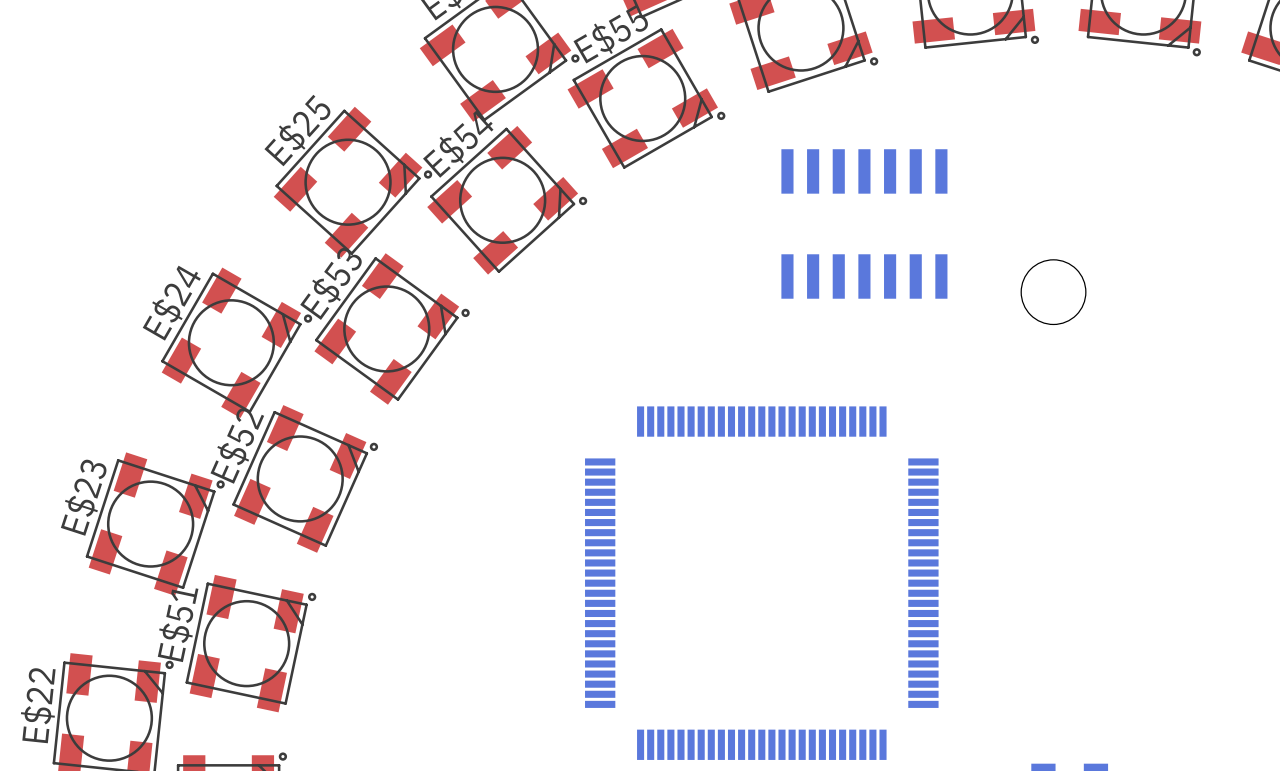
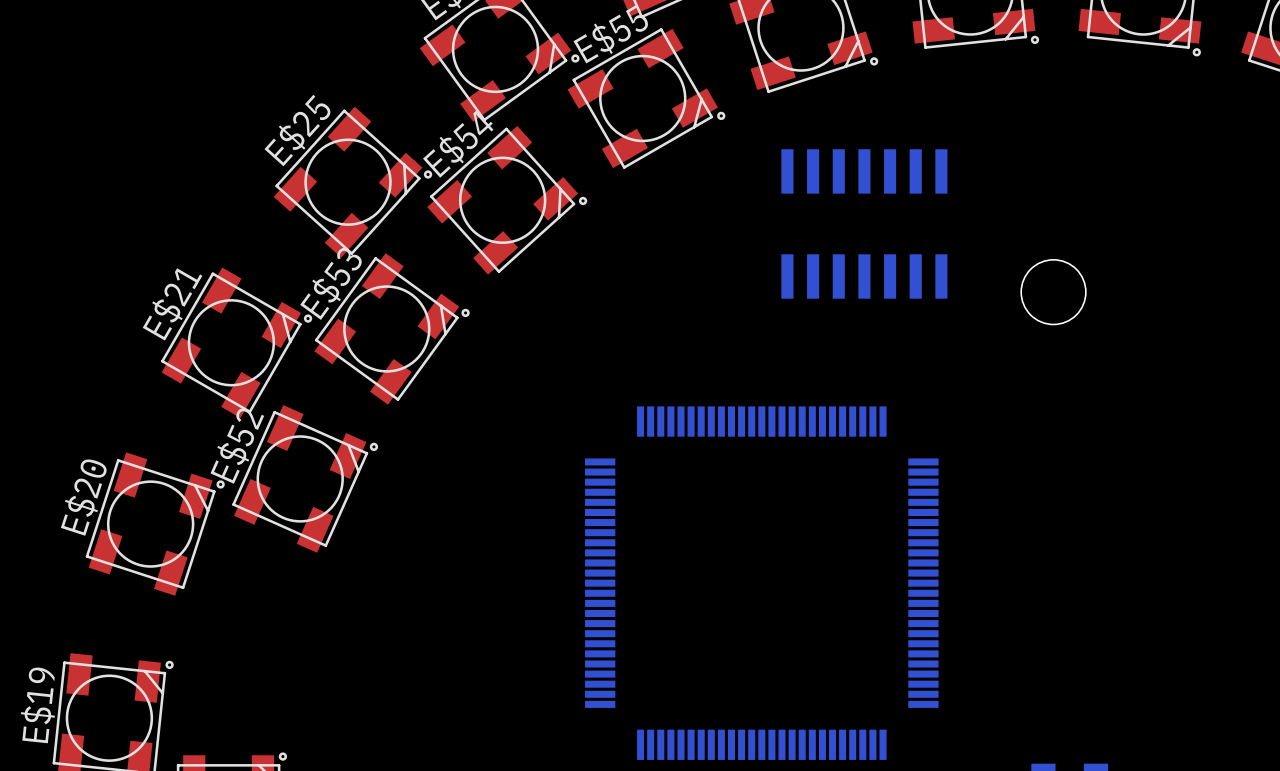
E$24 name: E$24 (171, 303) -> E$21 (172, 304)
E$23 name: E$23 (83, 497) -> E$20 (83, 497)
E$51: (250, 643) -> none
E$22 name: E$22 (38, 705) -> E$19 (37, 705)

